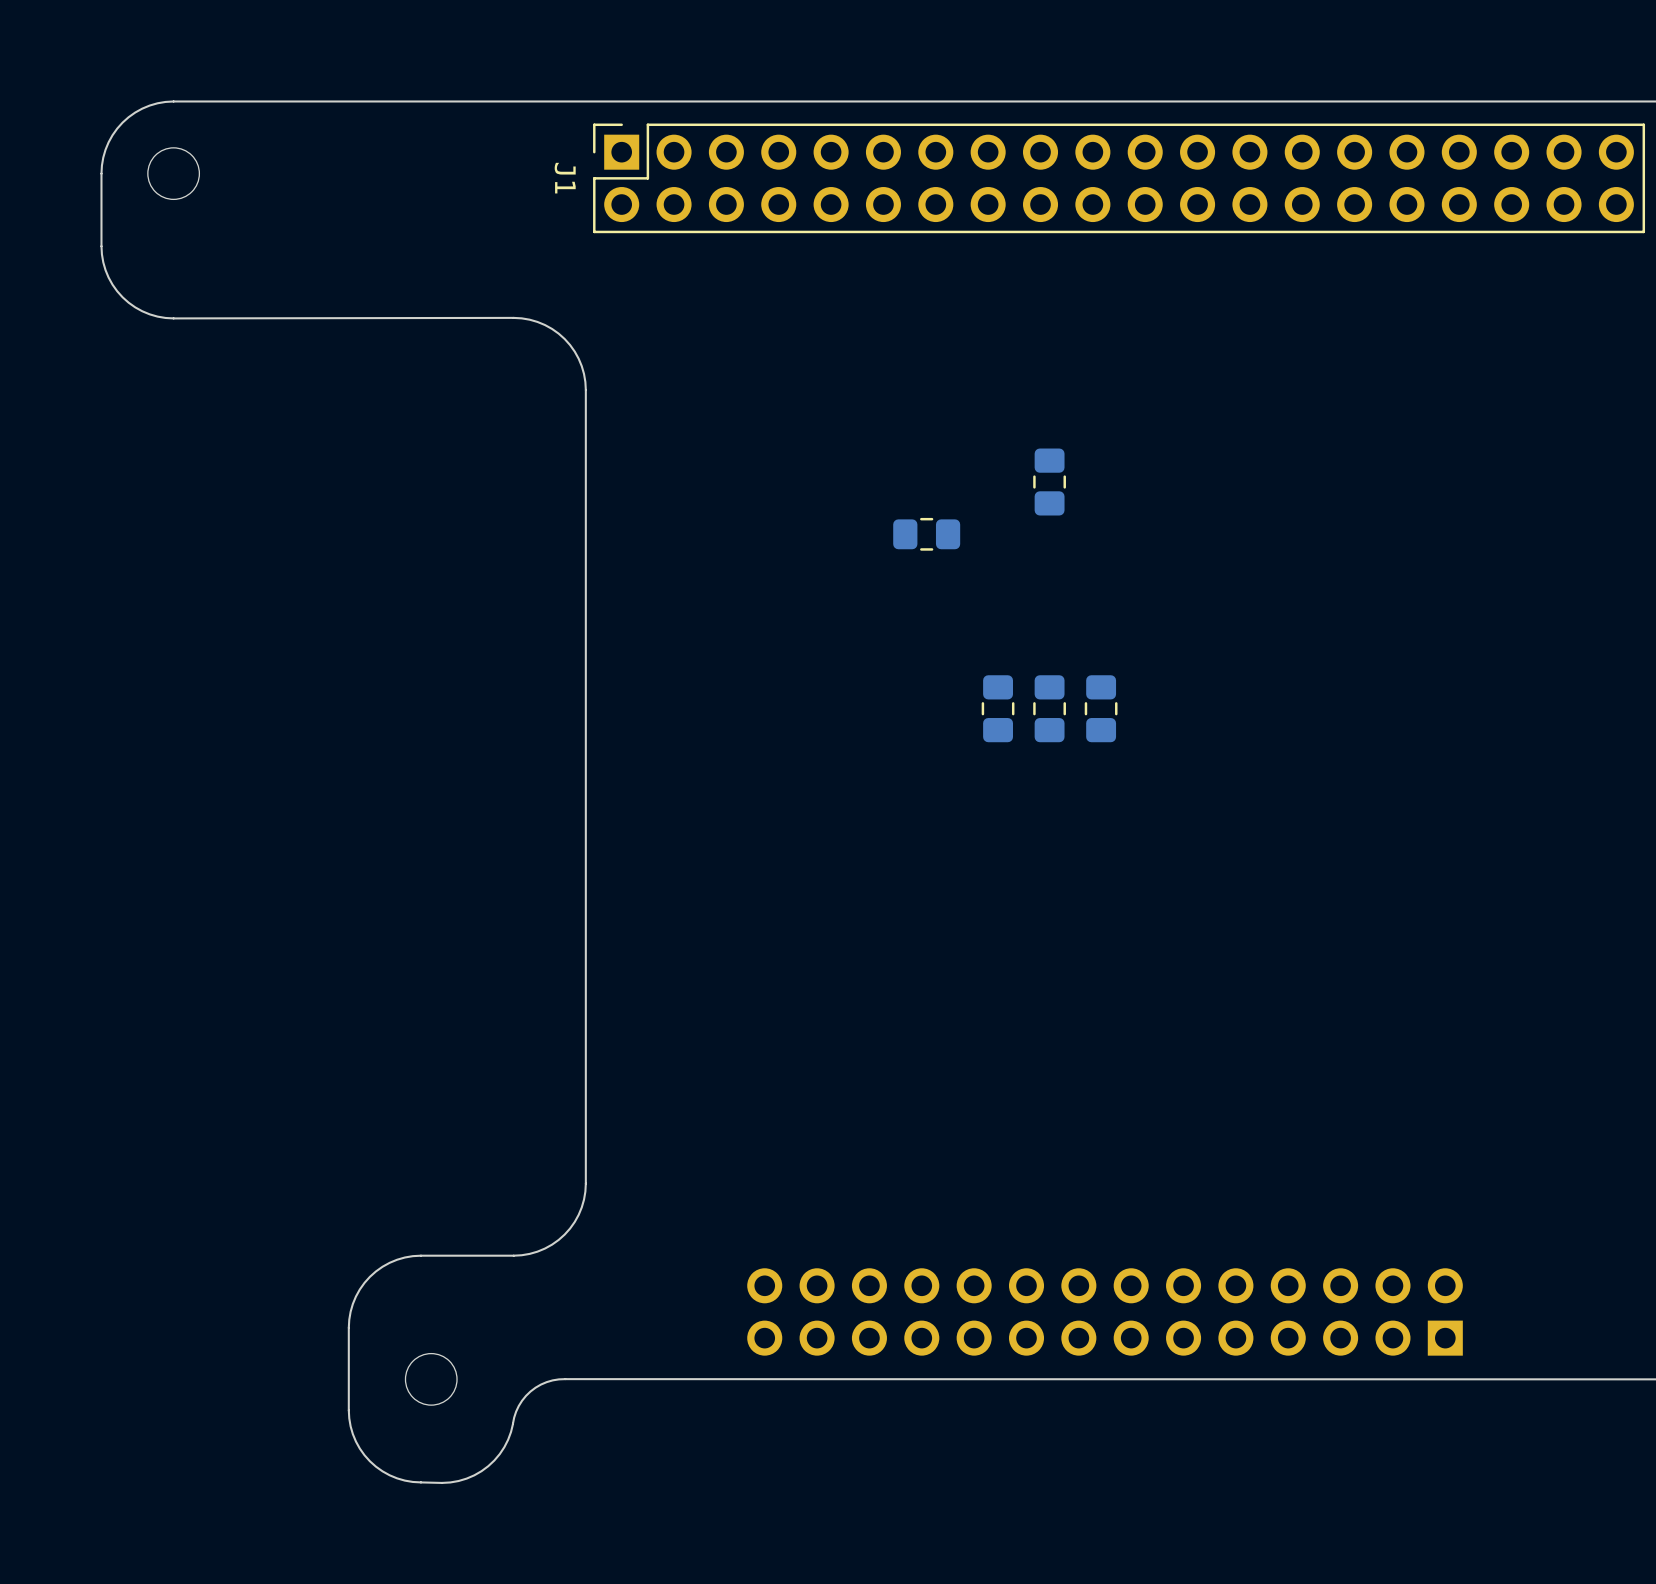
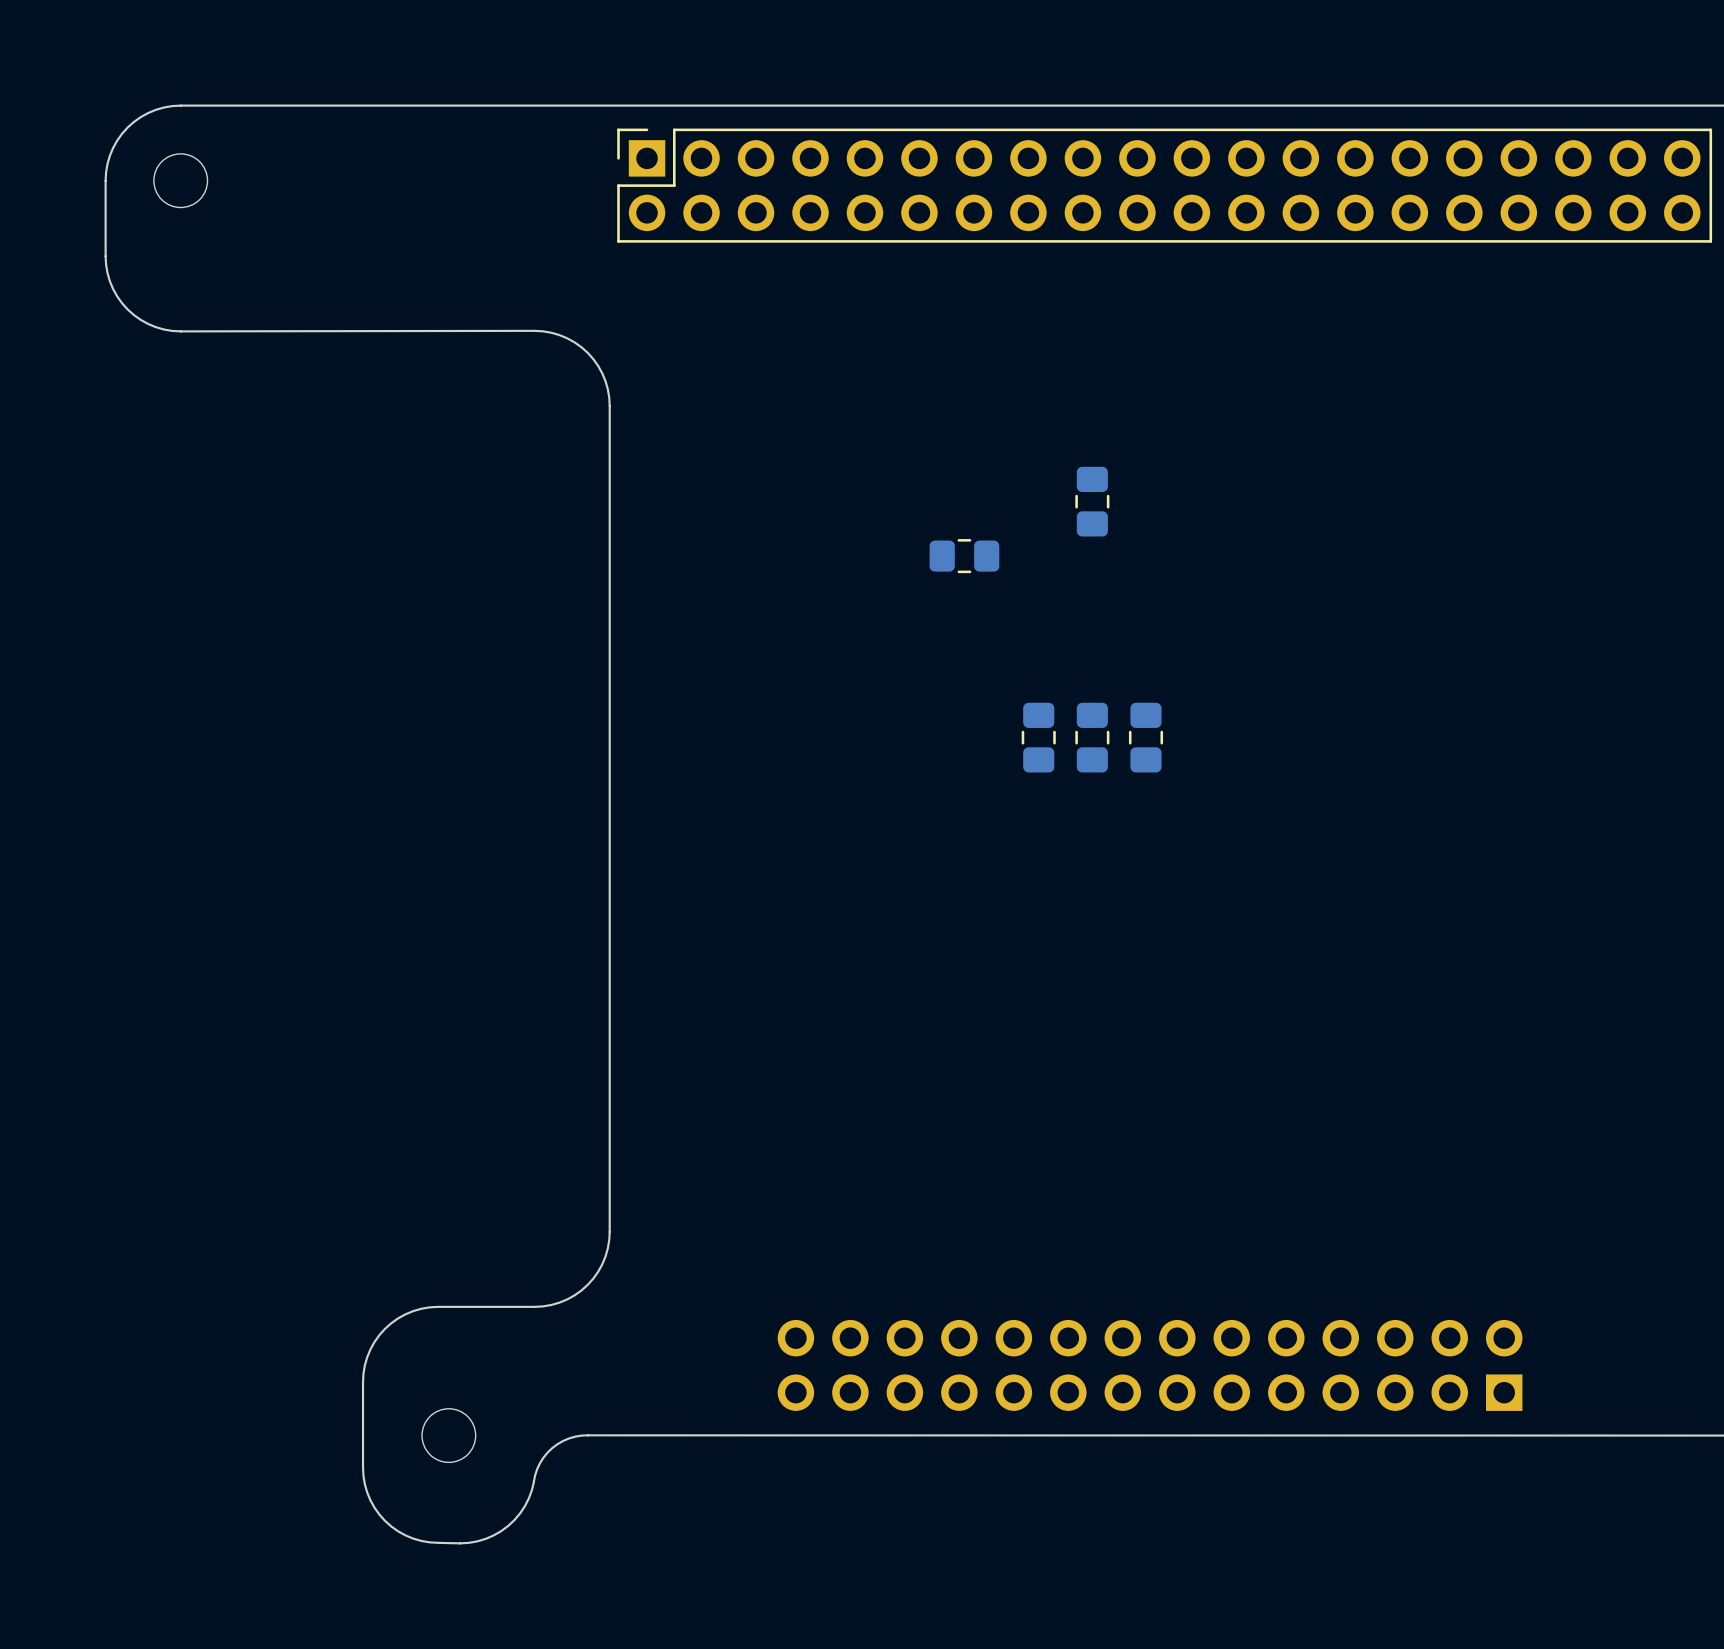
J1 name: J1 (565, 178) -> none

